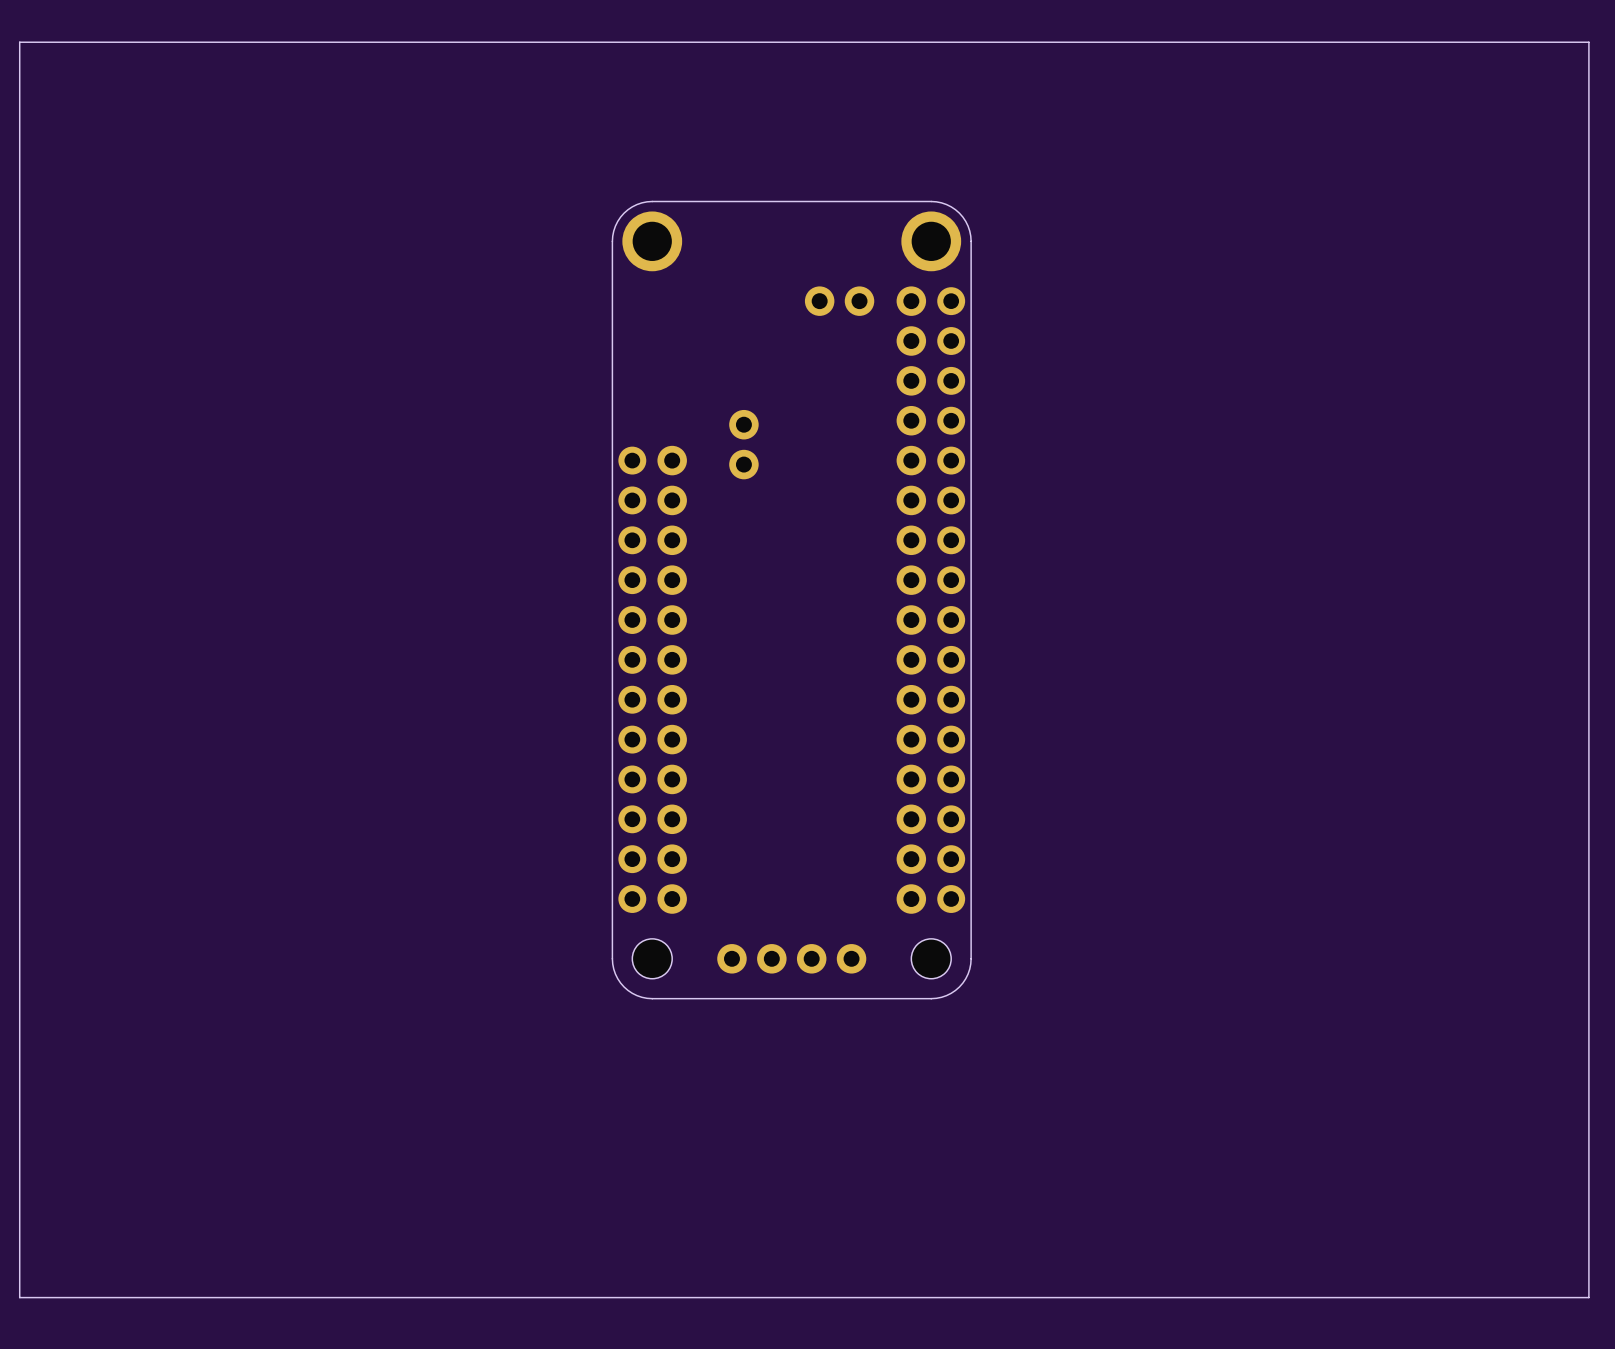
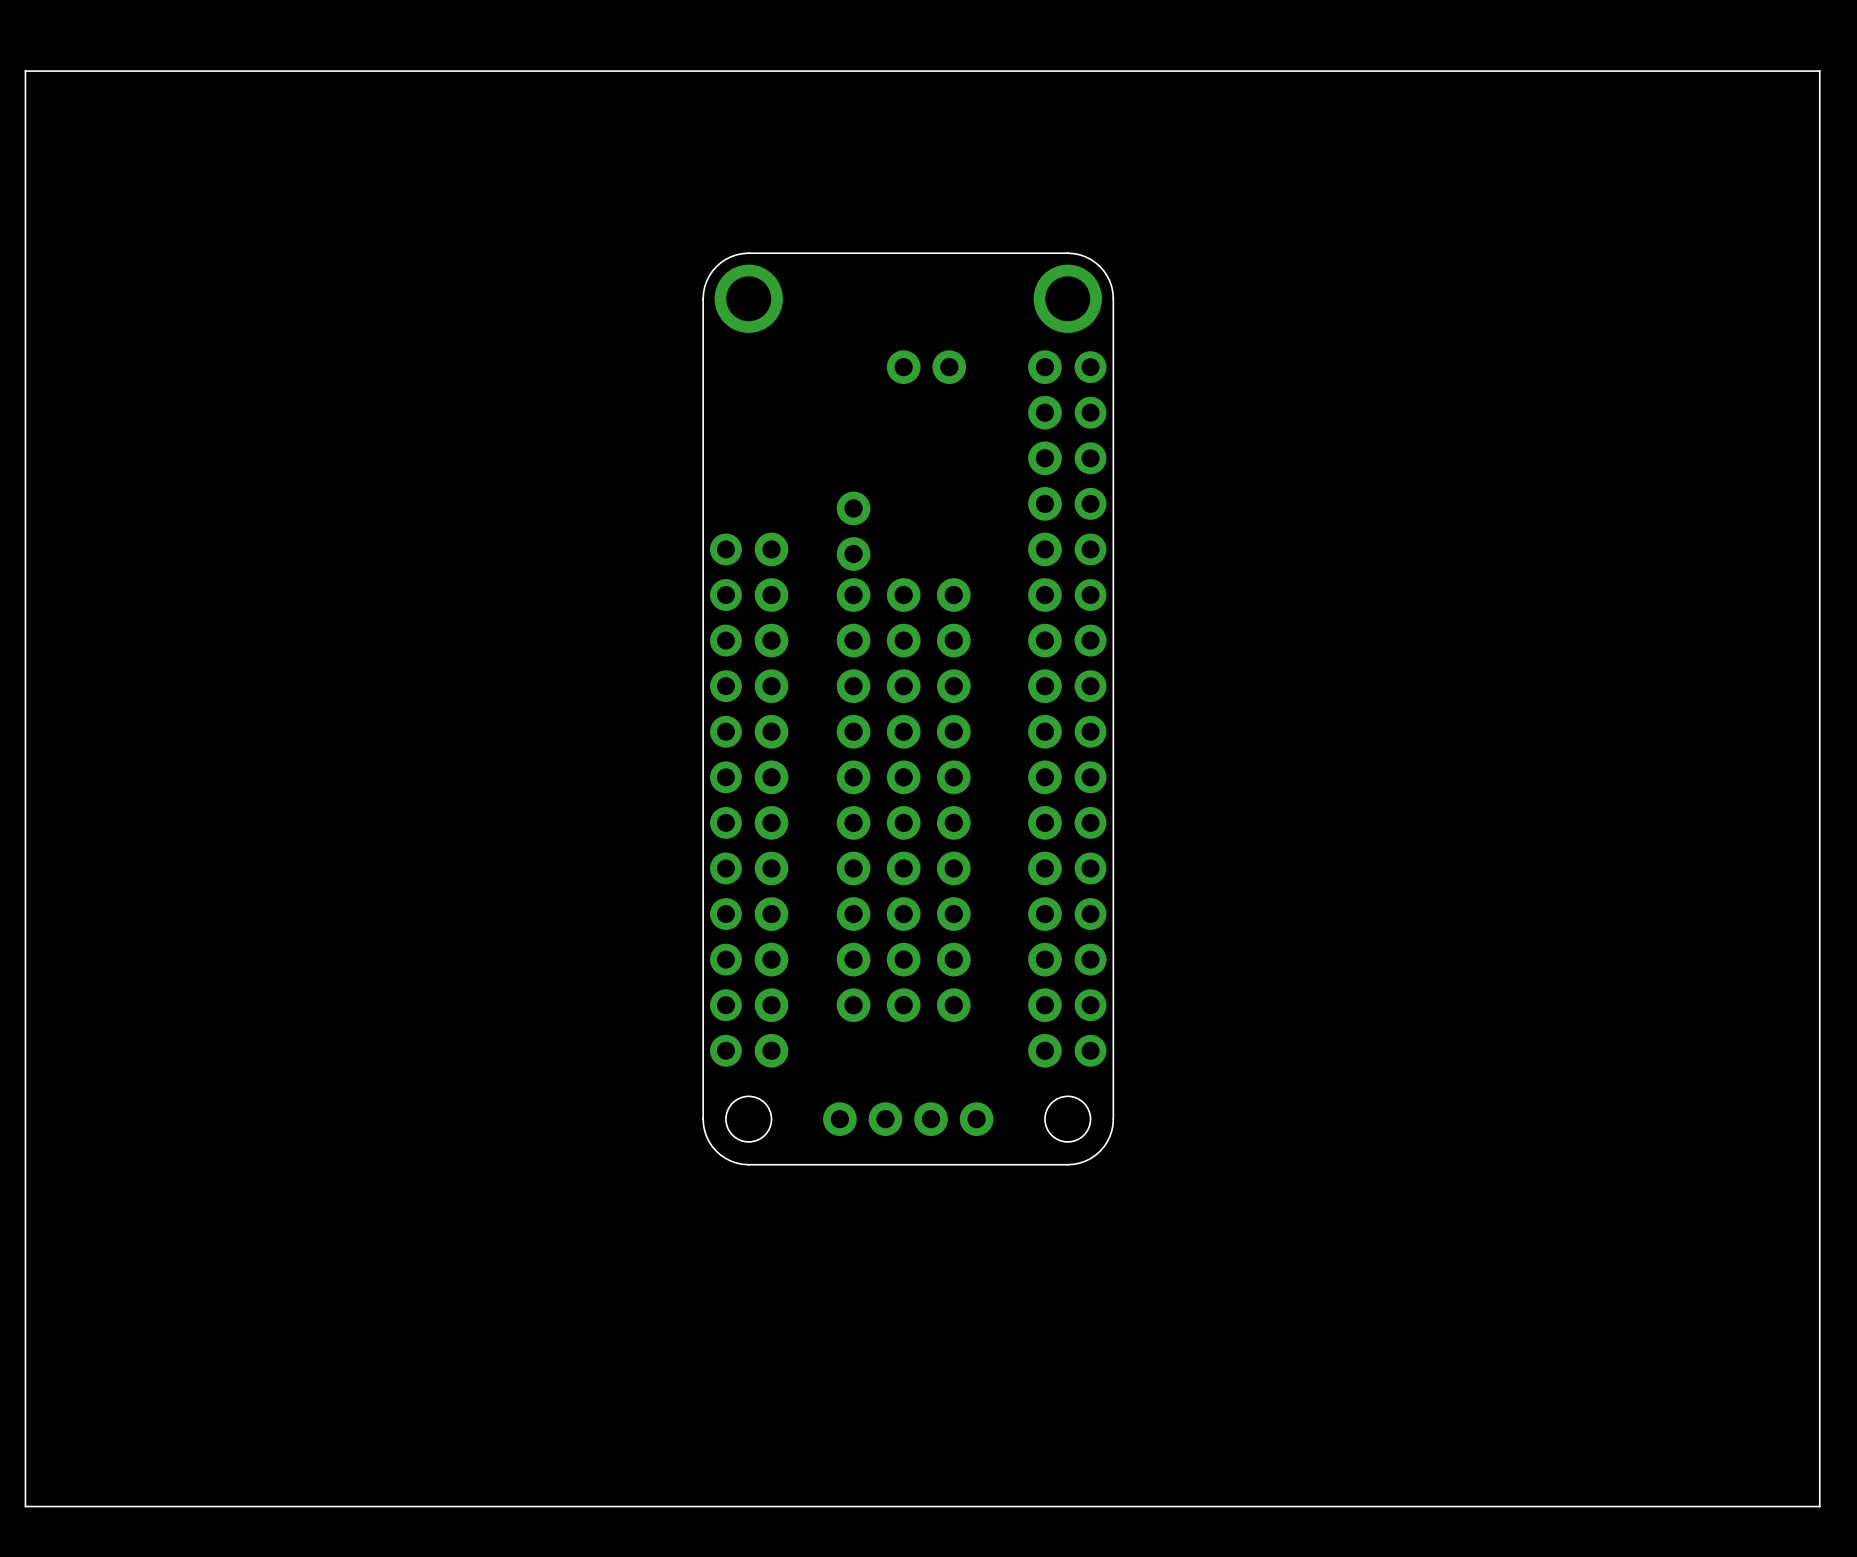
part position: (839, 301) -> (926, 367)
part: none -> (853, 800)
part: none -> (903, 800)
part: none -> (953, 800)

